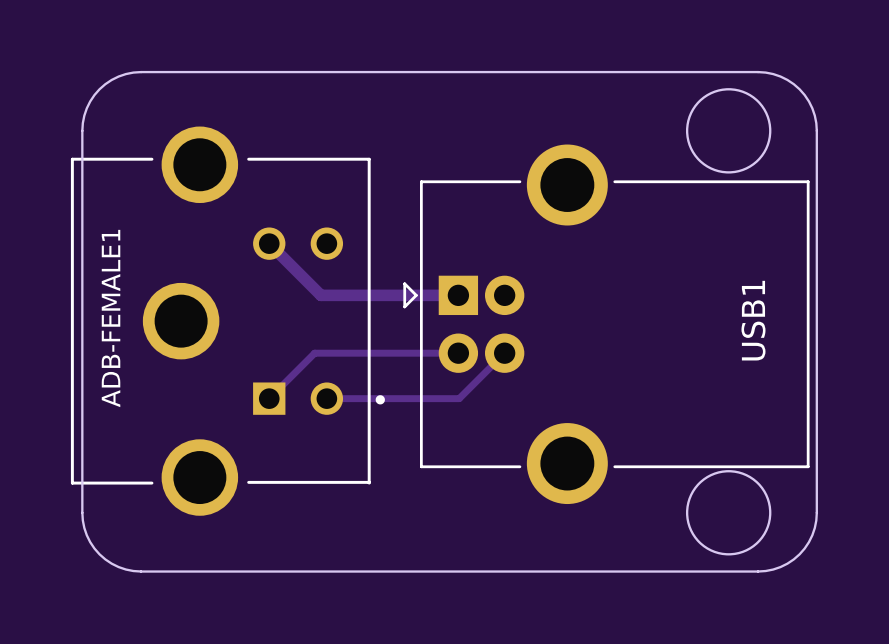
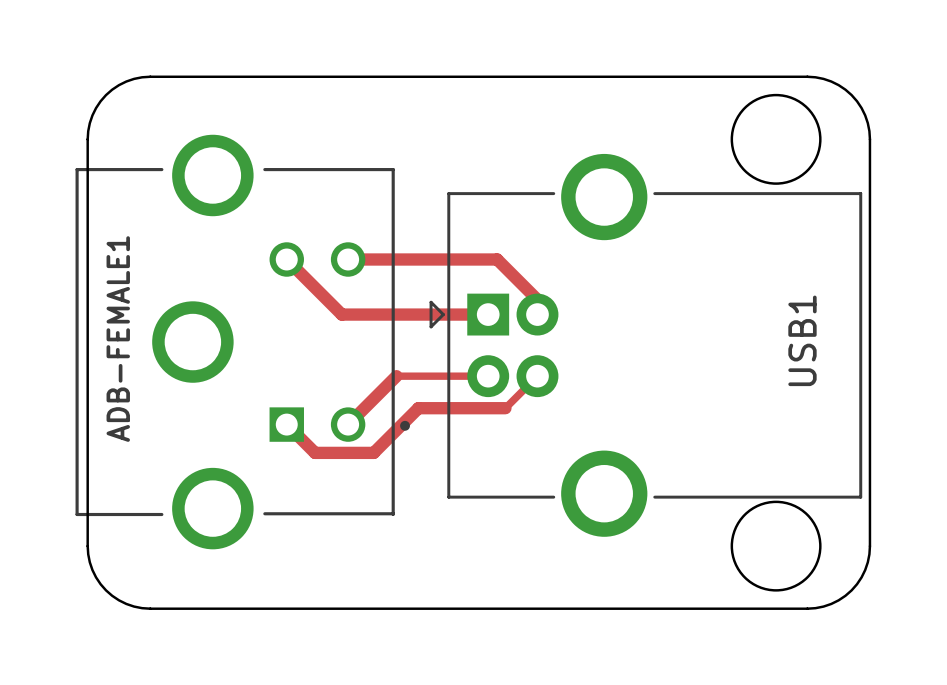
track: none -> (348, 259) (497, 259) (537, 299) (537, 314)
track: (372, 353) (314, 353) (269, 398) -> (396, 376) (348, 424)
track: (474, 383) (459, 398) (326, 398) -> (505, 408) (418, 408) (373, 452) (315, 452) (286, 424)

